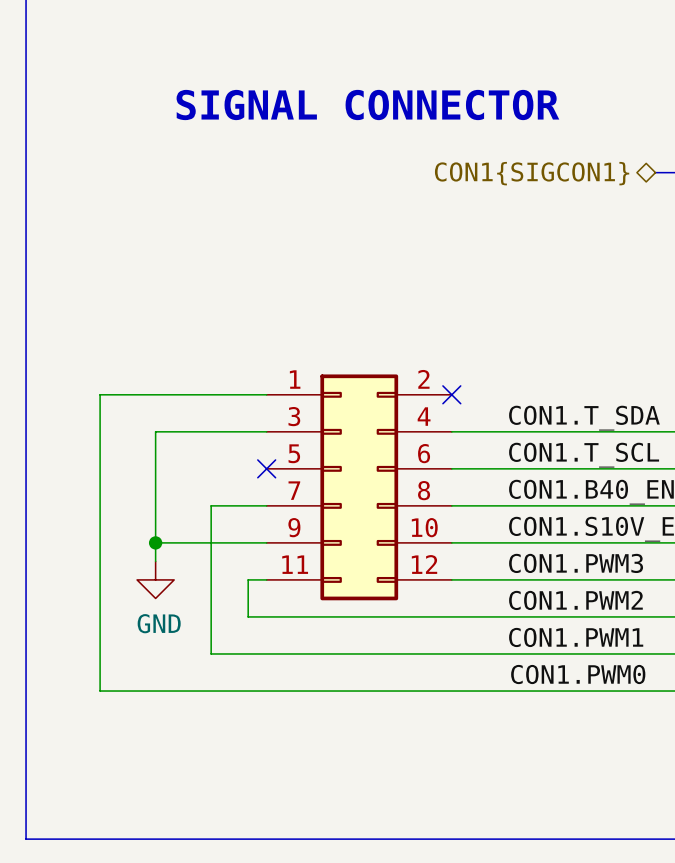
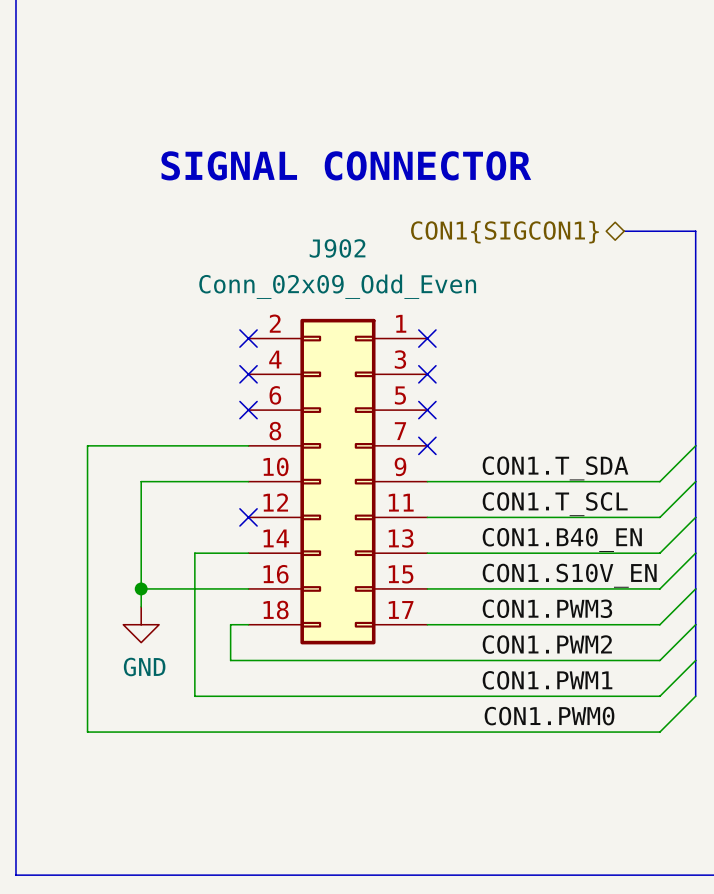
no-connect mark: none -> (248, 338)
no-connect mark: none -> (427, 338)
no-connect mark: none -> (248, 374)
no-connect mark: none -> (427, 374)
no-connect mark: none -> (248, 410)
no-connect mark: none -> (427, 410)
J902: none -> Conn_02x09_Odd_Even (337, 481)
part: (359, 487) -> none

